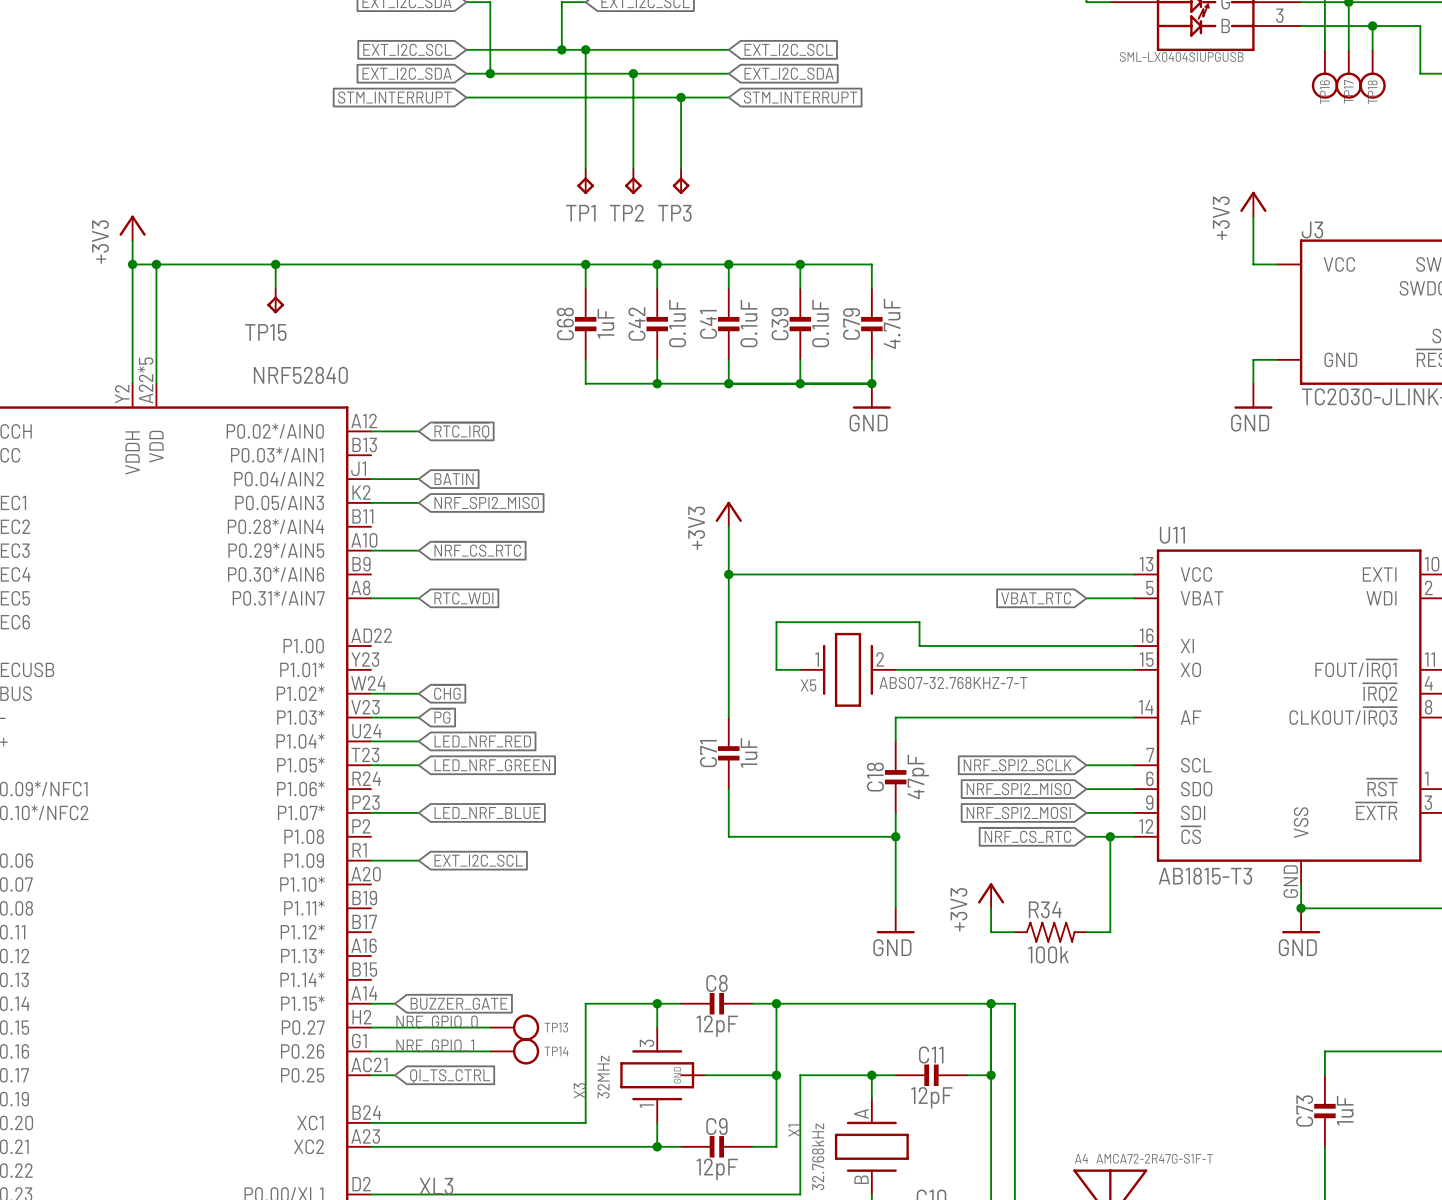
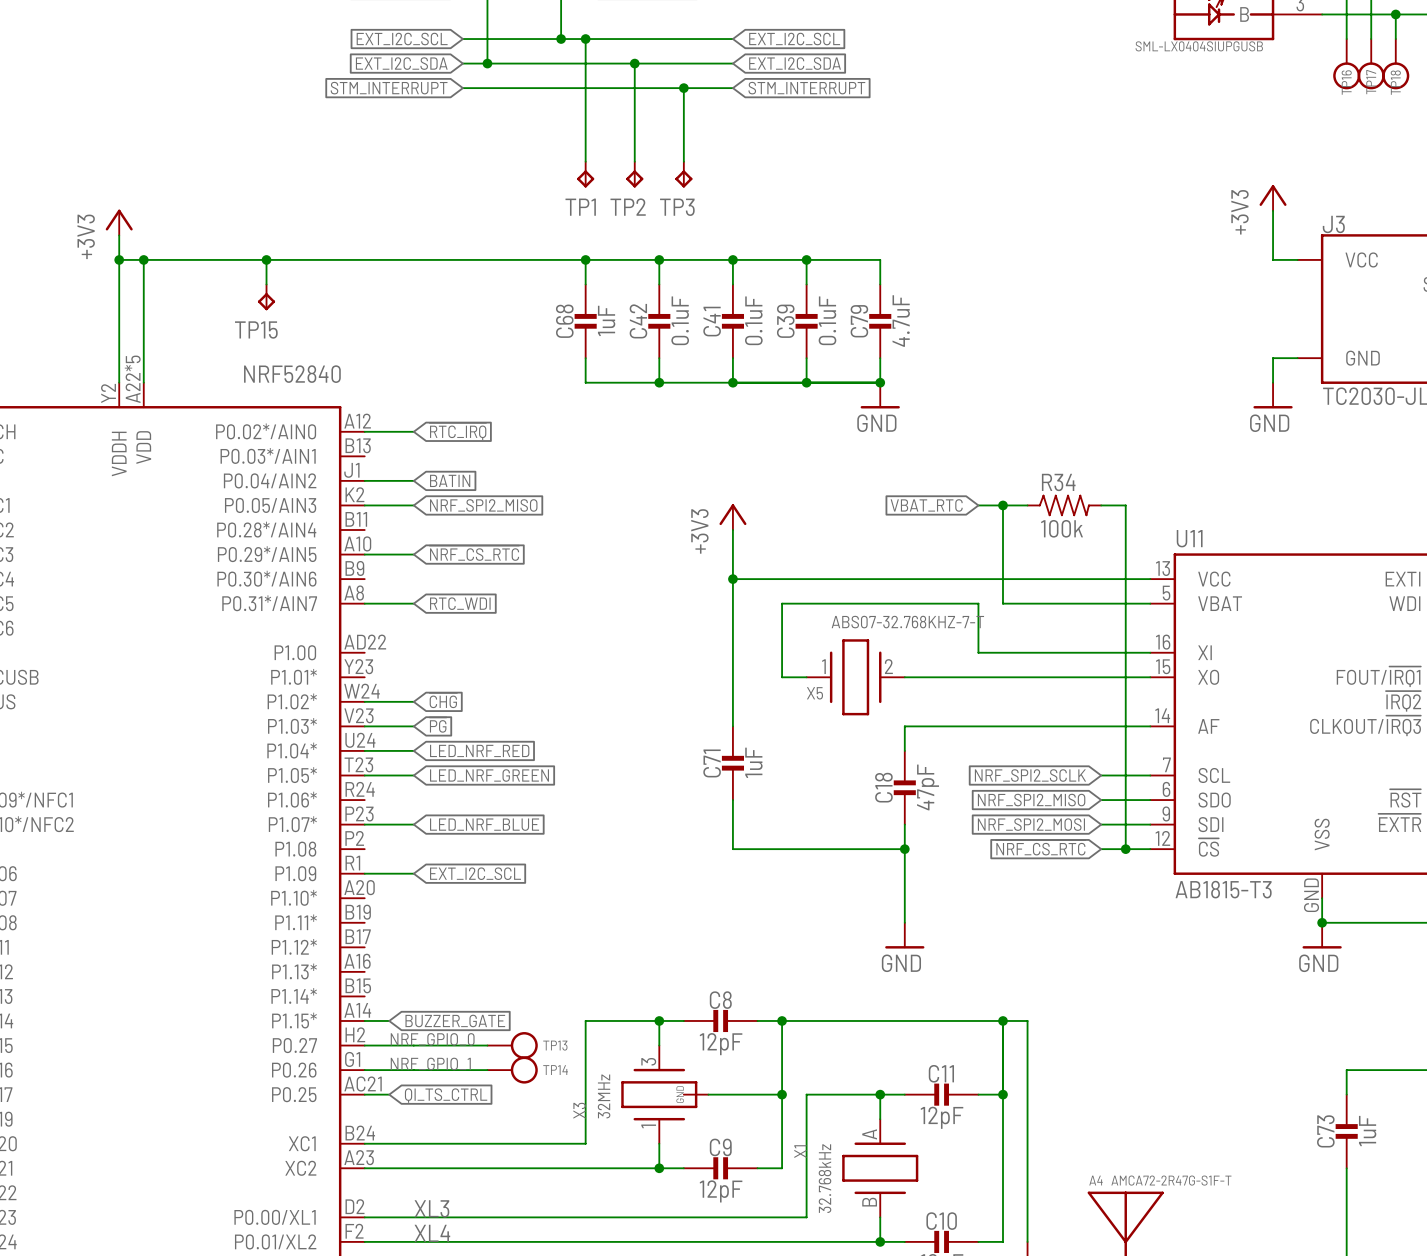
wire: none -> (978, 505) (1027, 505)
wire: none -> (1002, 505) (1002, 603) (1101, 603)
junction: none -> (1002, 505)
global label position: VBAT_RTC (1036, 598) -> VBAT_RTC (926, 505)
wire: (776, 622) (919, 622) (919, 646) (967, 646) -> (782, 628) (782, 603) (978, 603) (978, 652)
X5 value position: ABS07-32.768KHZ-7-T (953, 682) -> ABS07-32.768KHZ-7-T (907, 622)
wire: (1110, 836) (1110, 932) (1086, 932) -> (1125, 849) (1125, 505) (1101, 505)
power symbol: +3V3 (991, 895) -> none
wire: (991, 908) (991, 932) (1014, 932) -> none
R34 position: (1050, 932) -> (1064, 505)

